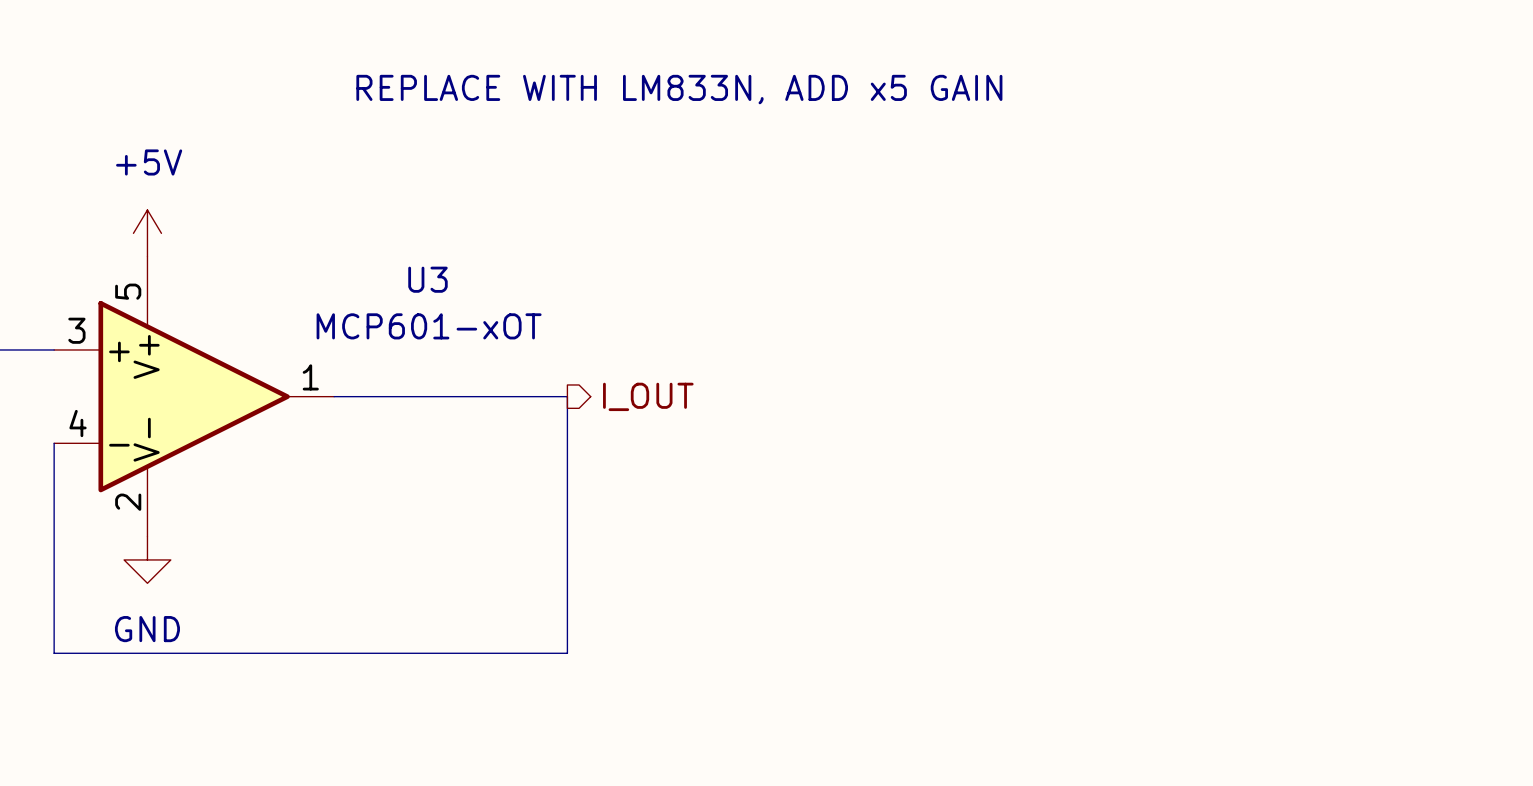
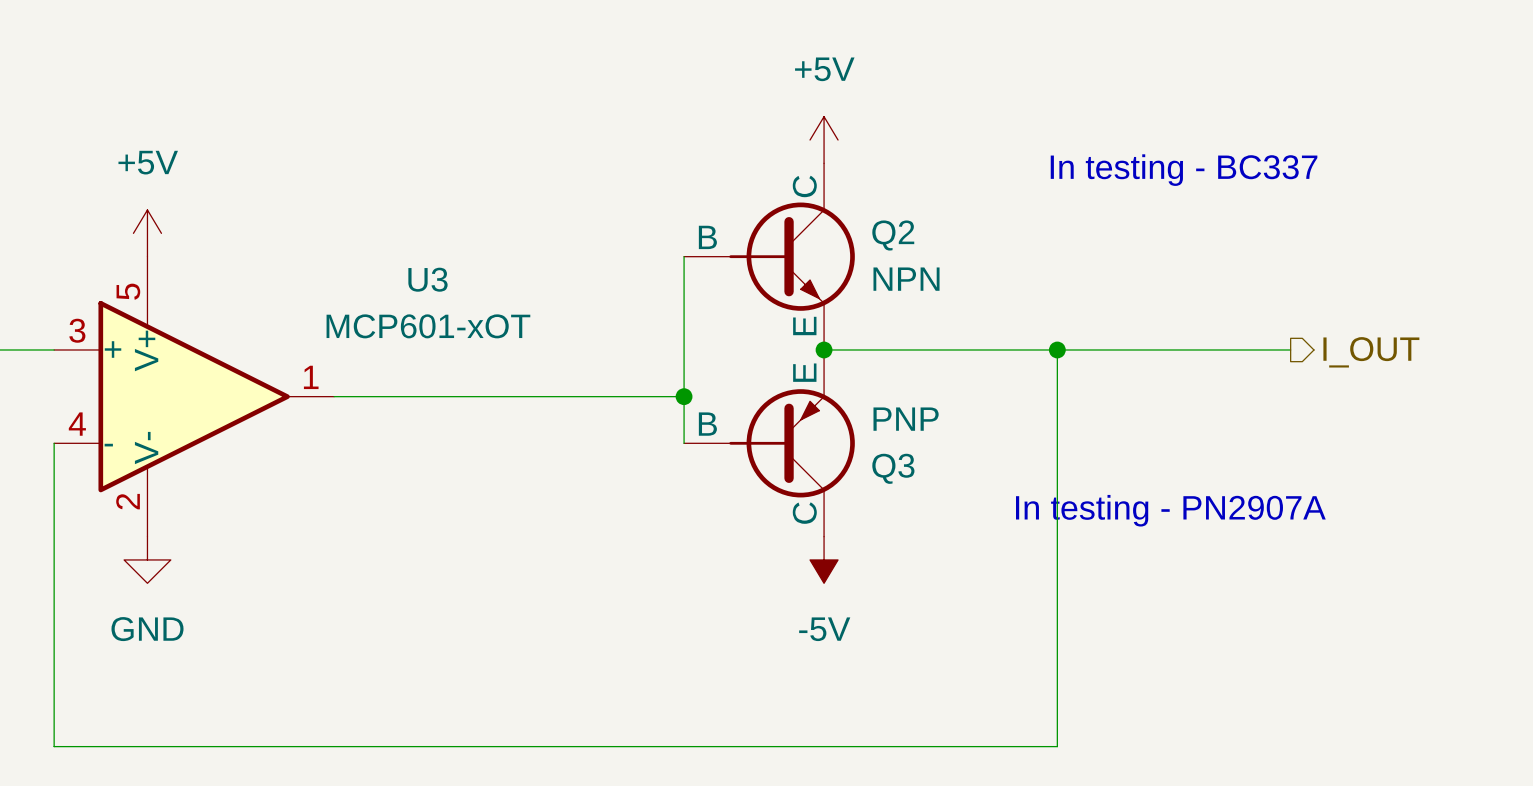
text: REPLACE WITH LM833N, ADD x5 GAIN (679, 89) -> none
power symbol: none -> +5V (824, 140)
text: none -> In testing - BC337 (1184, 170)
wire: none -> (684, 256) (684, 443)
Q2: none -> NPN (769, 256)
wire: none -> (824, 349) (1290, 349)
junction: none -> (824, 349)
junction: none -> (1057, 349)
hierarchical label: none -> I_OUT (1371, 352)
wire: (567, 396) (567, 653) (54, 653) -> (1057, 349) (1057, 746) (54, 746) (54, 653)
wire: none -> (567, 396) (684, 396)
hierarchical label: I_OUT (648, 396) -> none
junction: none -> (684, 396)
Q3: none -> PNP (769, 443)
text: none -> In testing - PN2907A (1170, 510)
power symbol: none -> -5V (824, 559)

